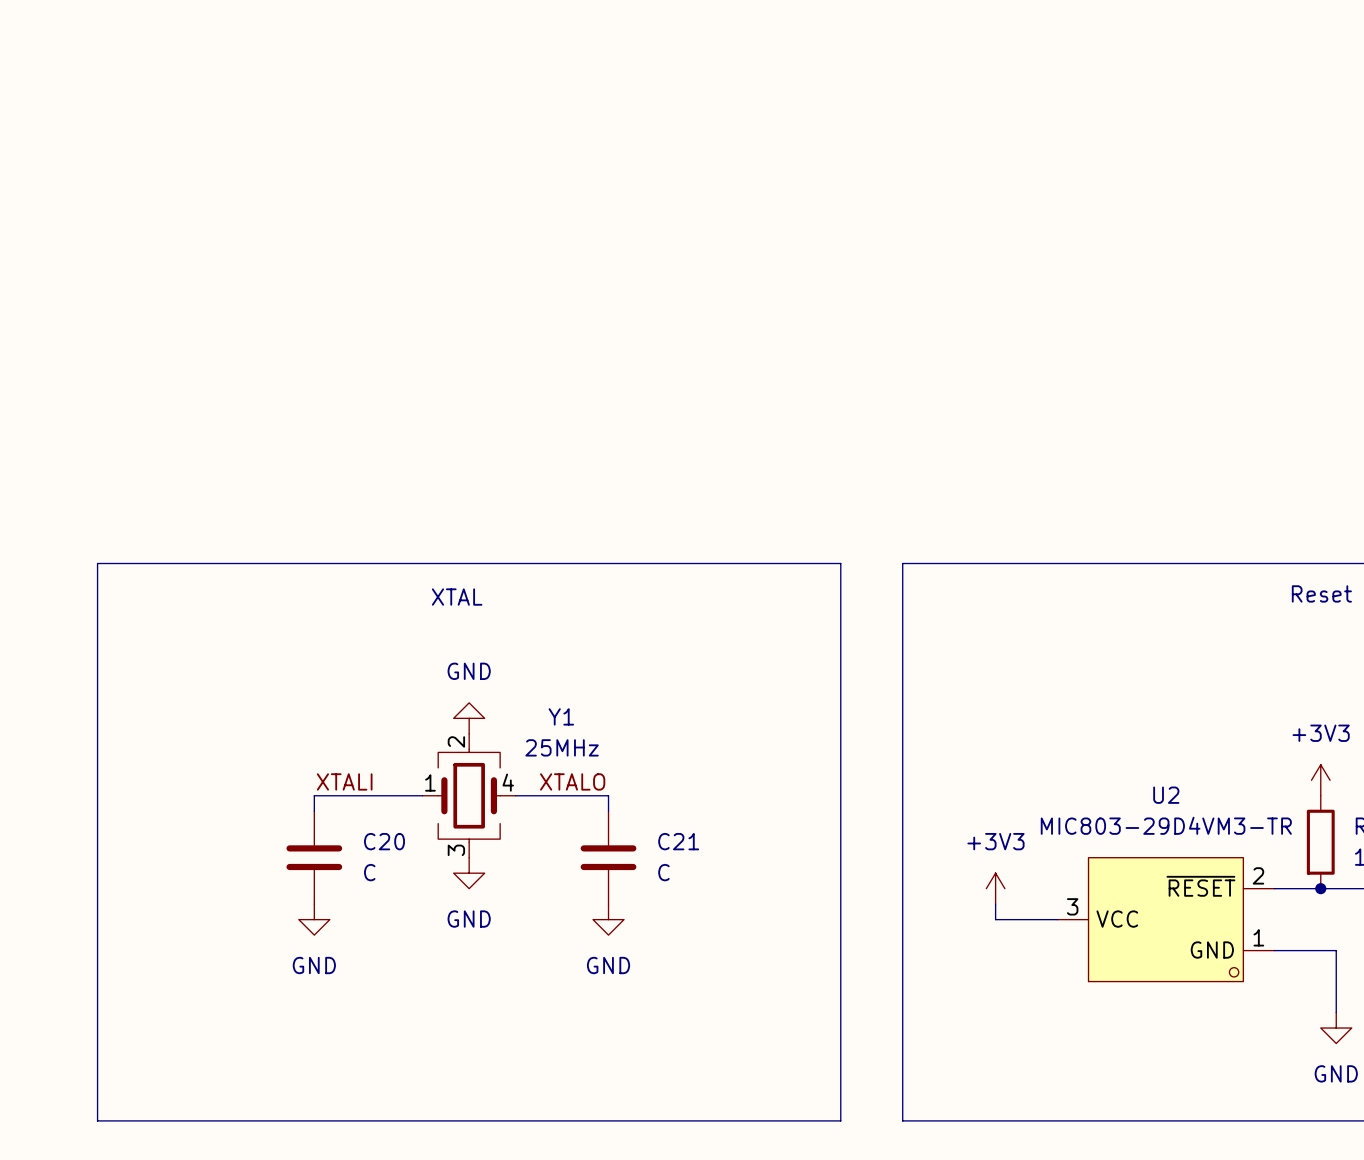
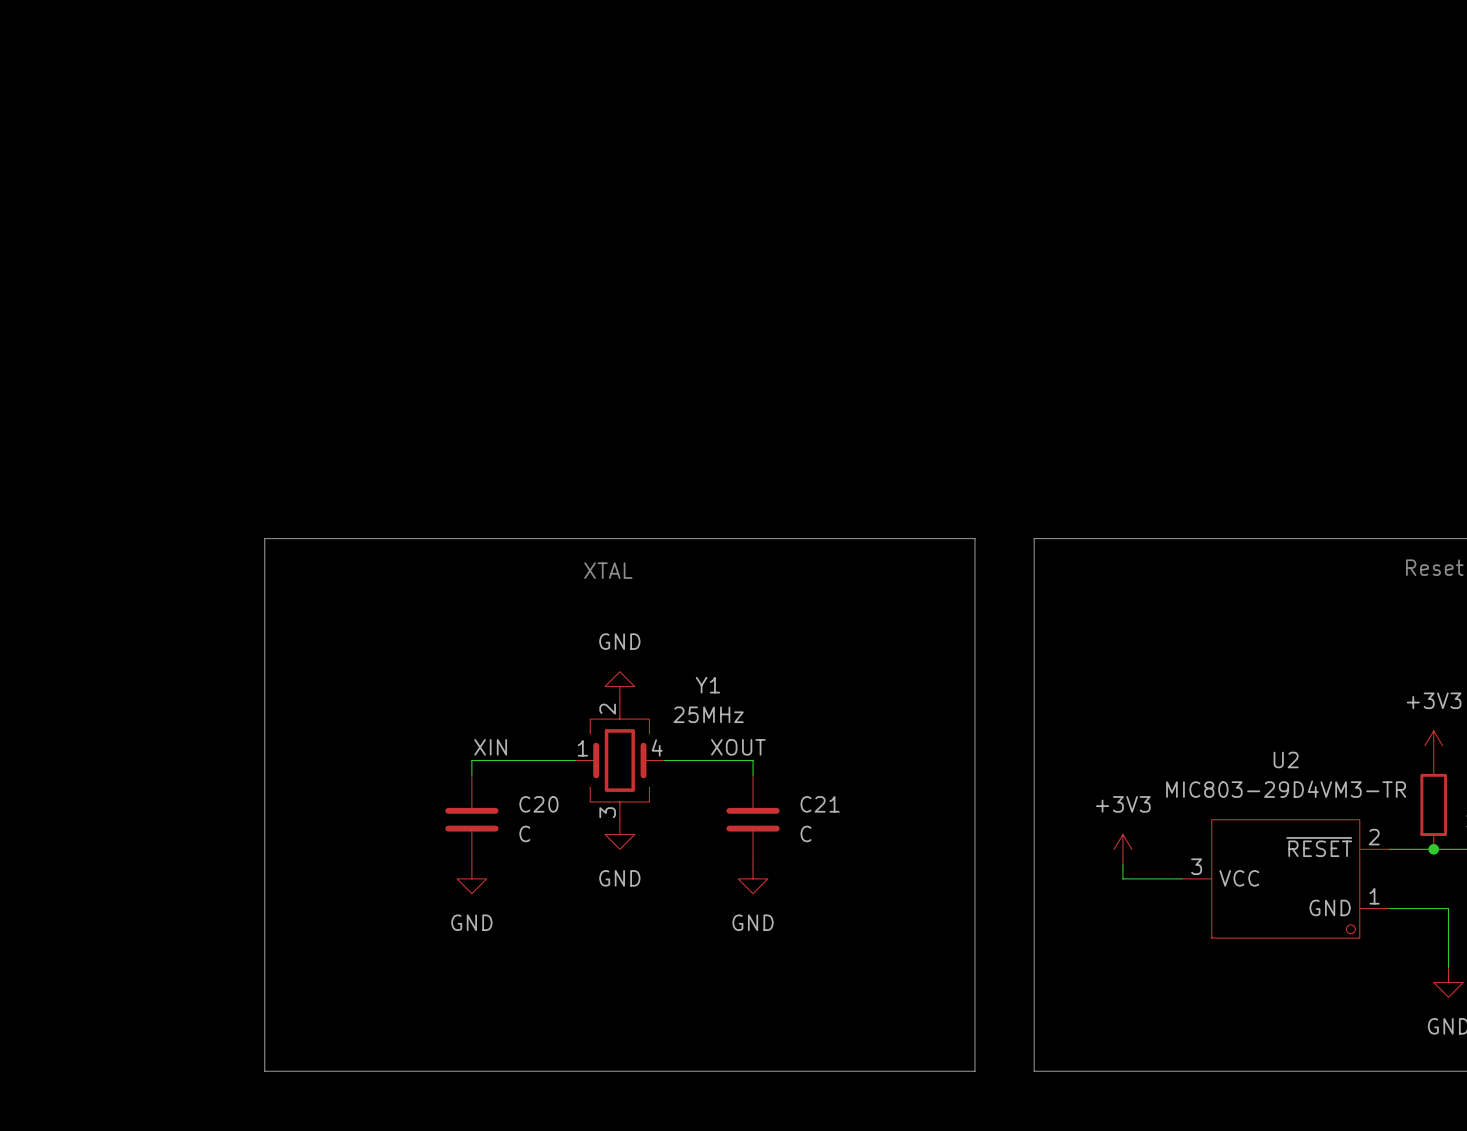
label: XTALI (344, 781) -> XIN (490, 747)
label: XTALO (572, 781) -> none
label: none -> XOUT (738, 747)

